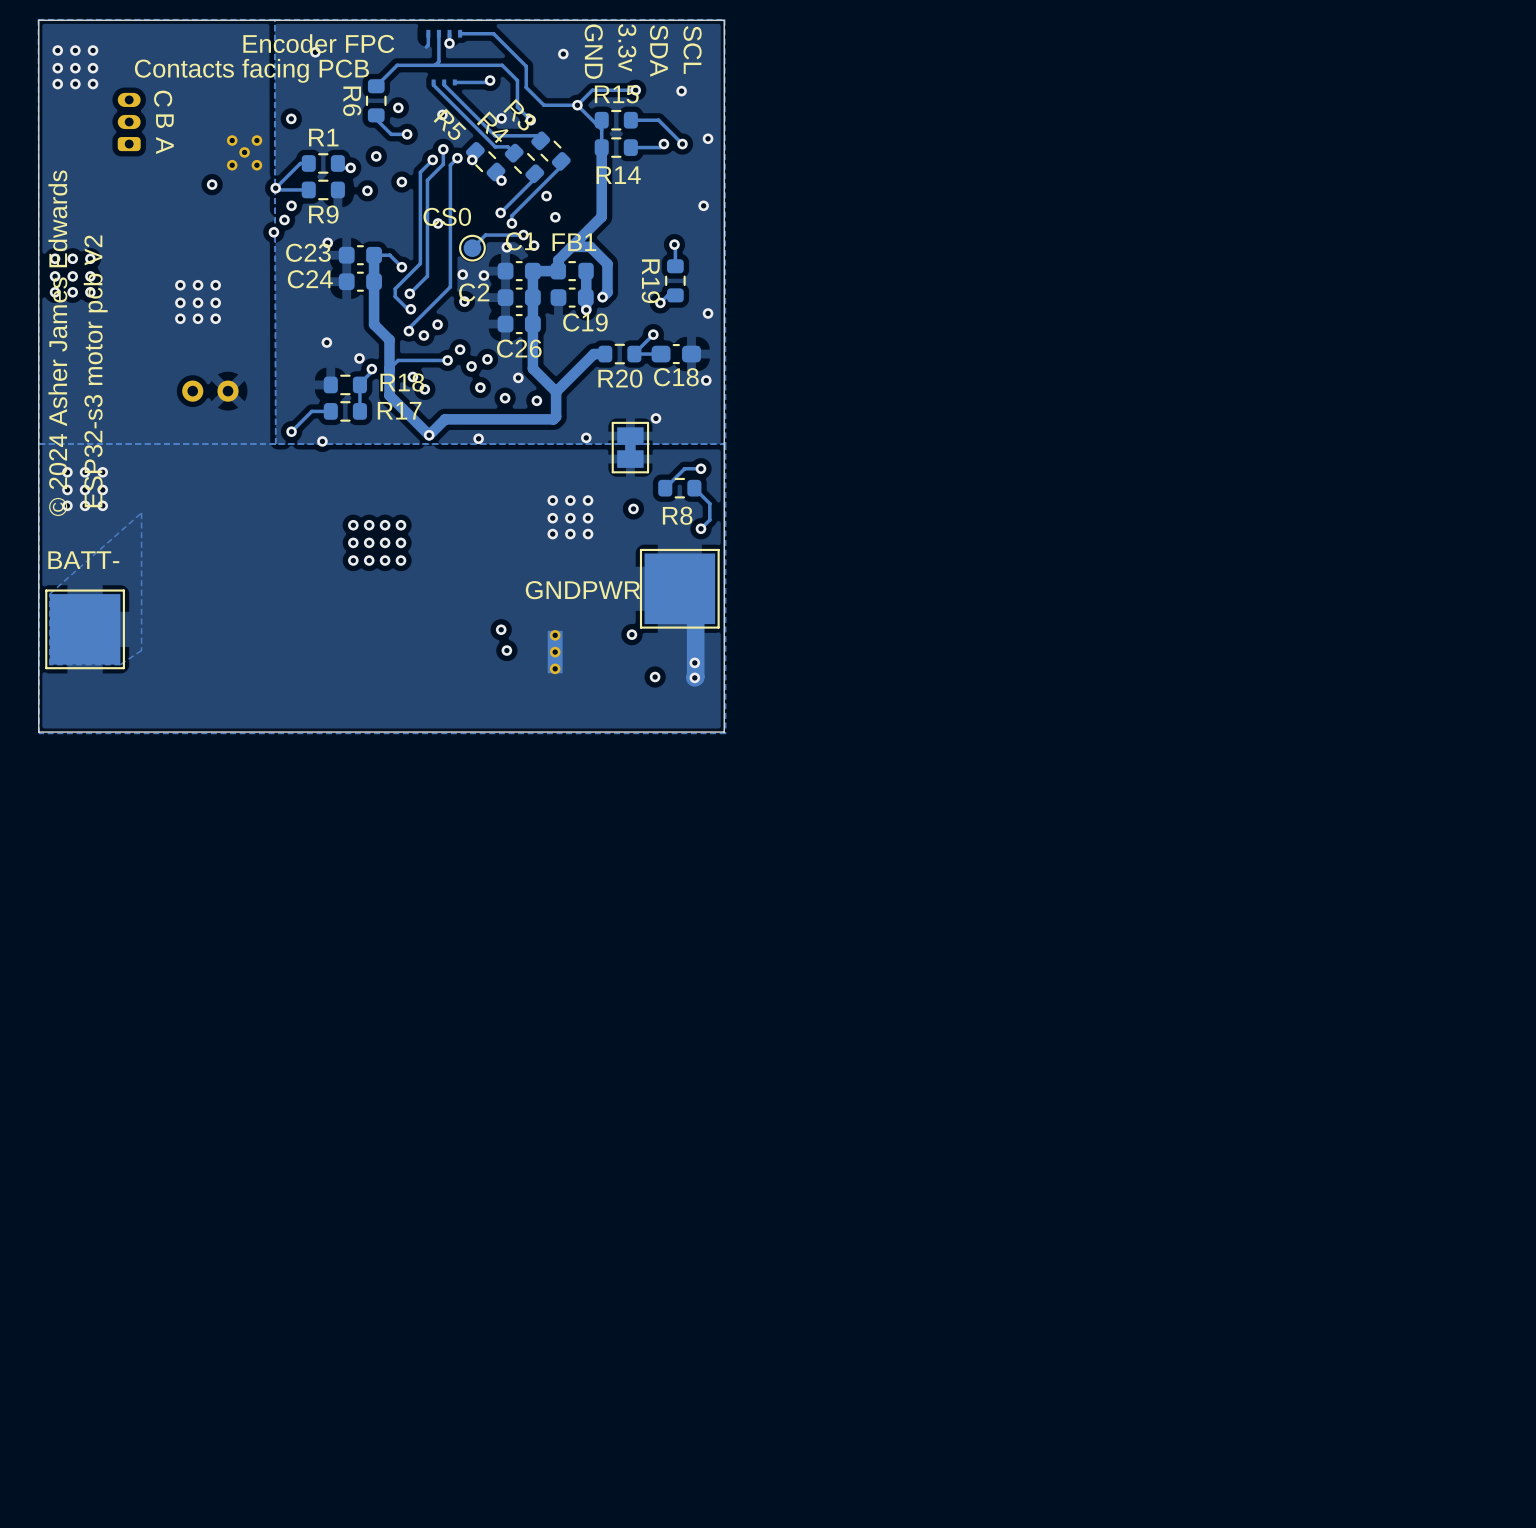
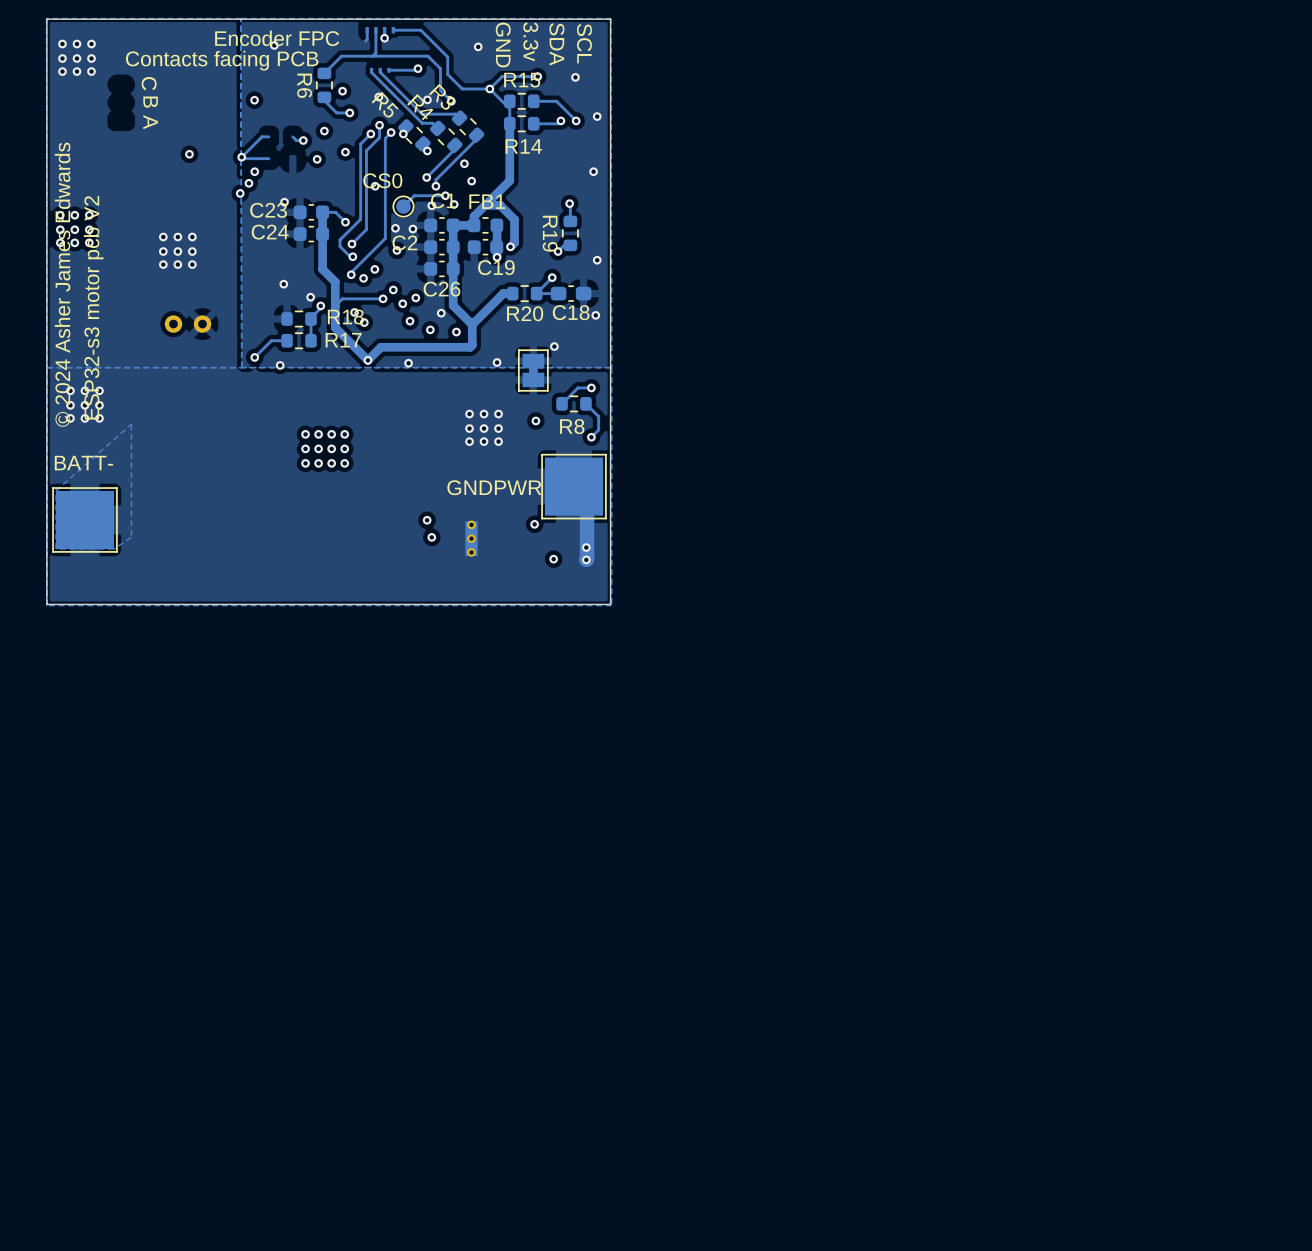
part: (129, 121) -> none
part: (244, 152) -> none
R1: (323, 163) -> none
R9: (323, 189) -> none

